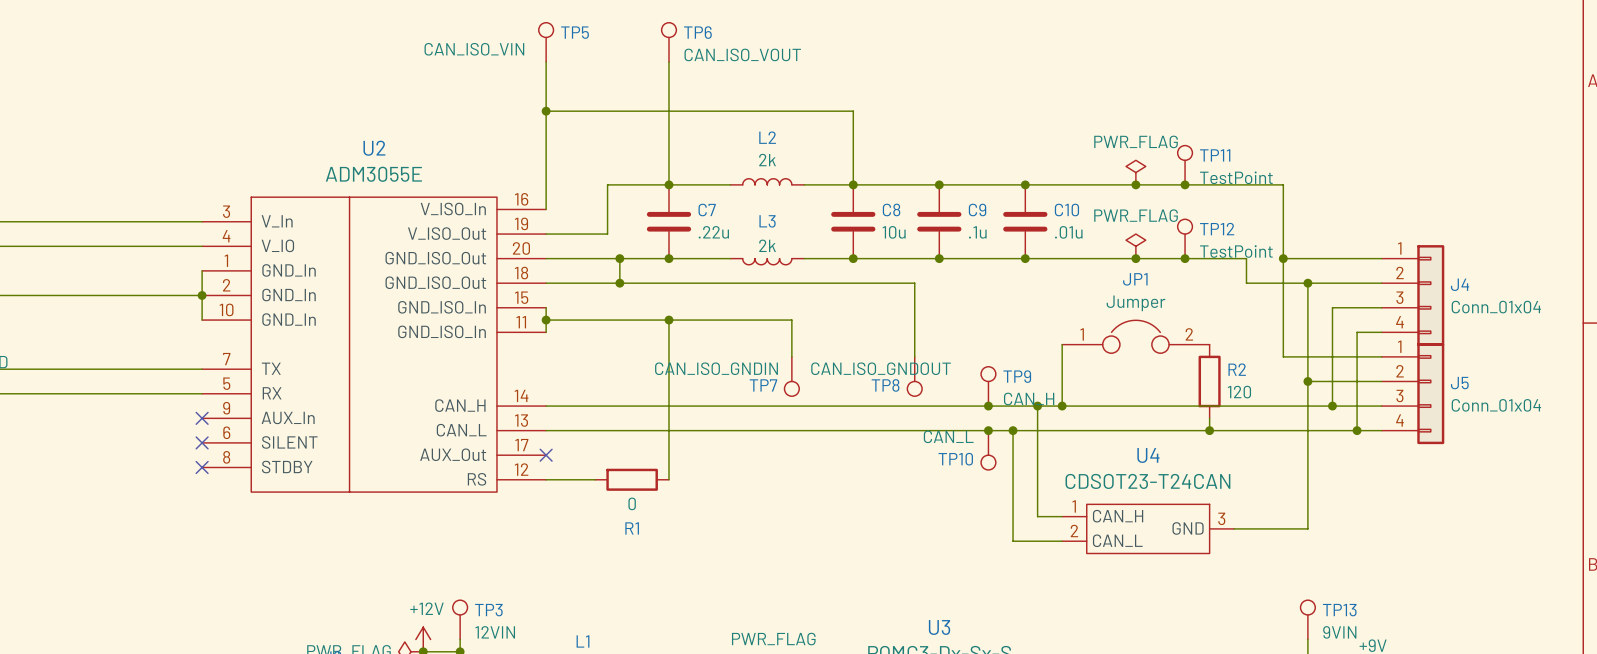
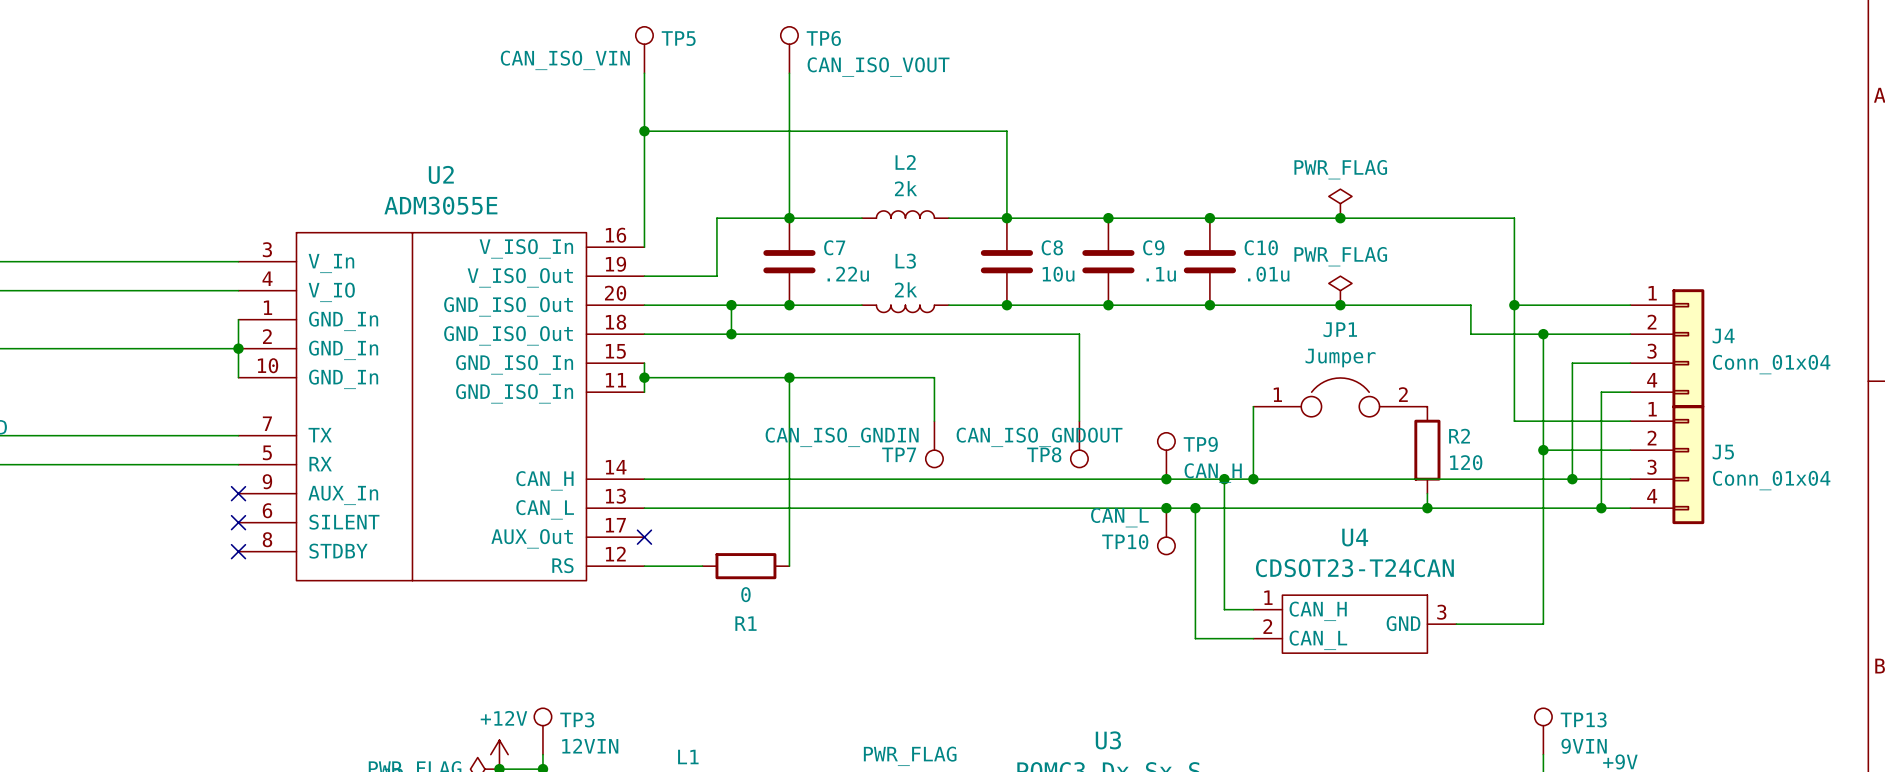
TP11: TestPoint (1185, 165) -> none
junction: (1185, 184) -> none
TP12: TestPoint (1185, 238) -> none
junction: (1185, 258) -> none

